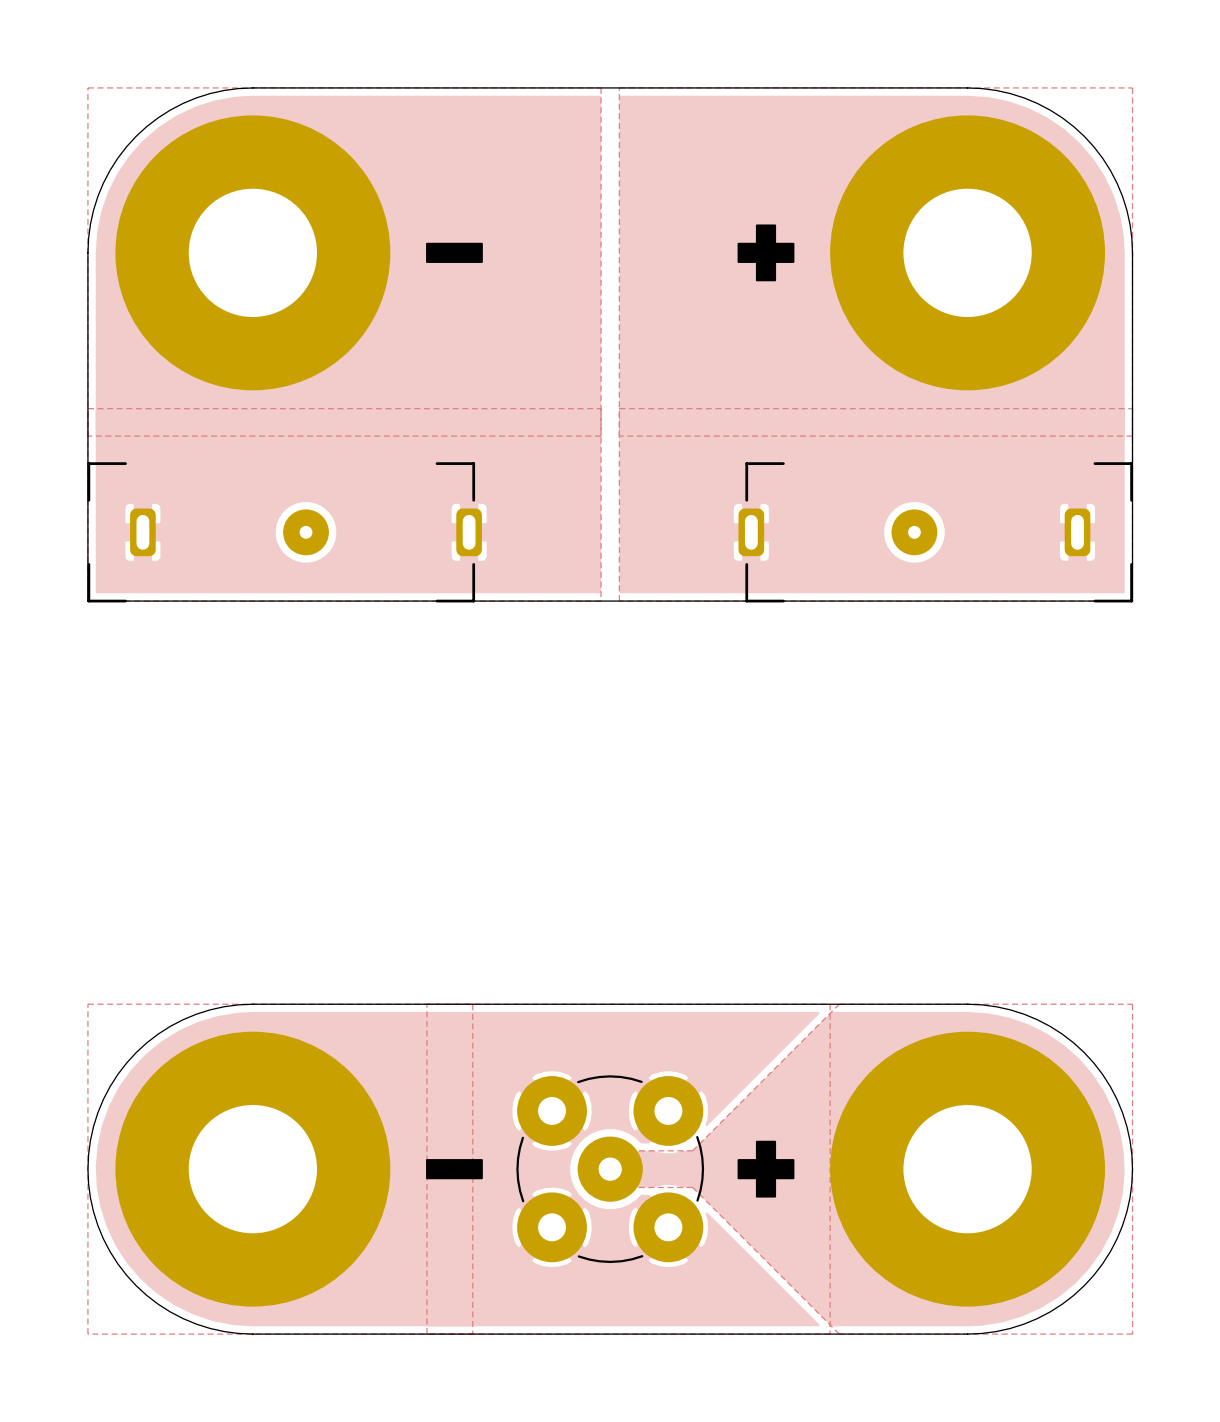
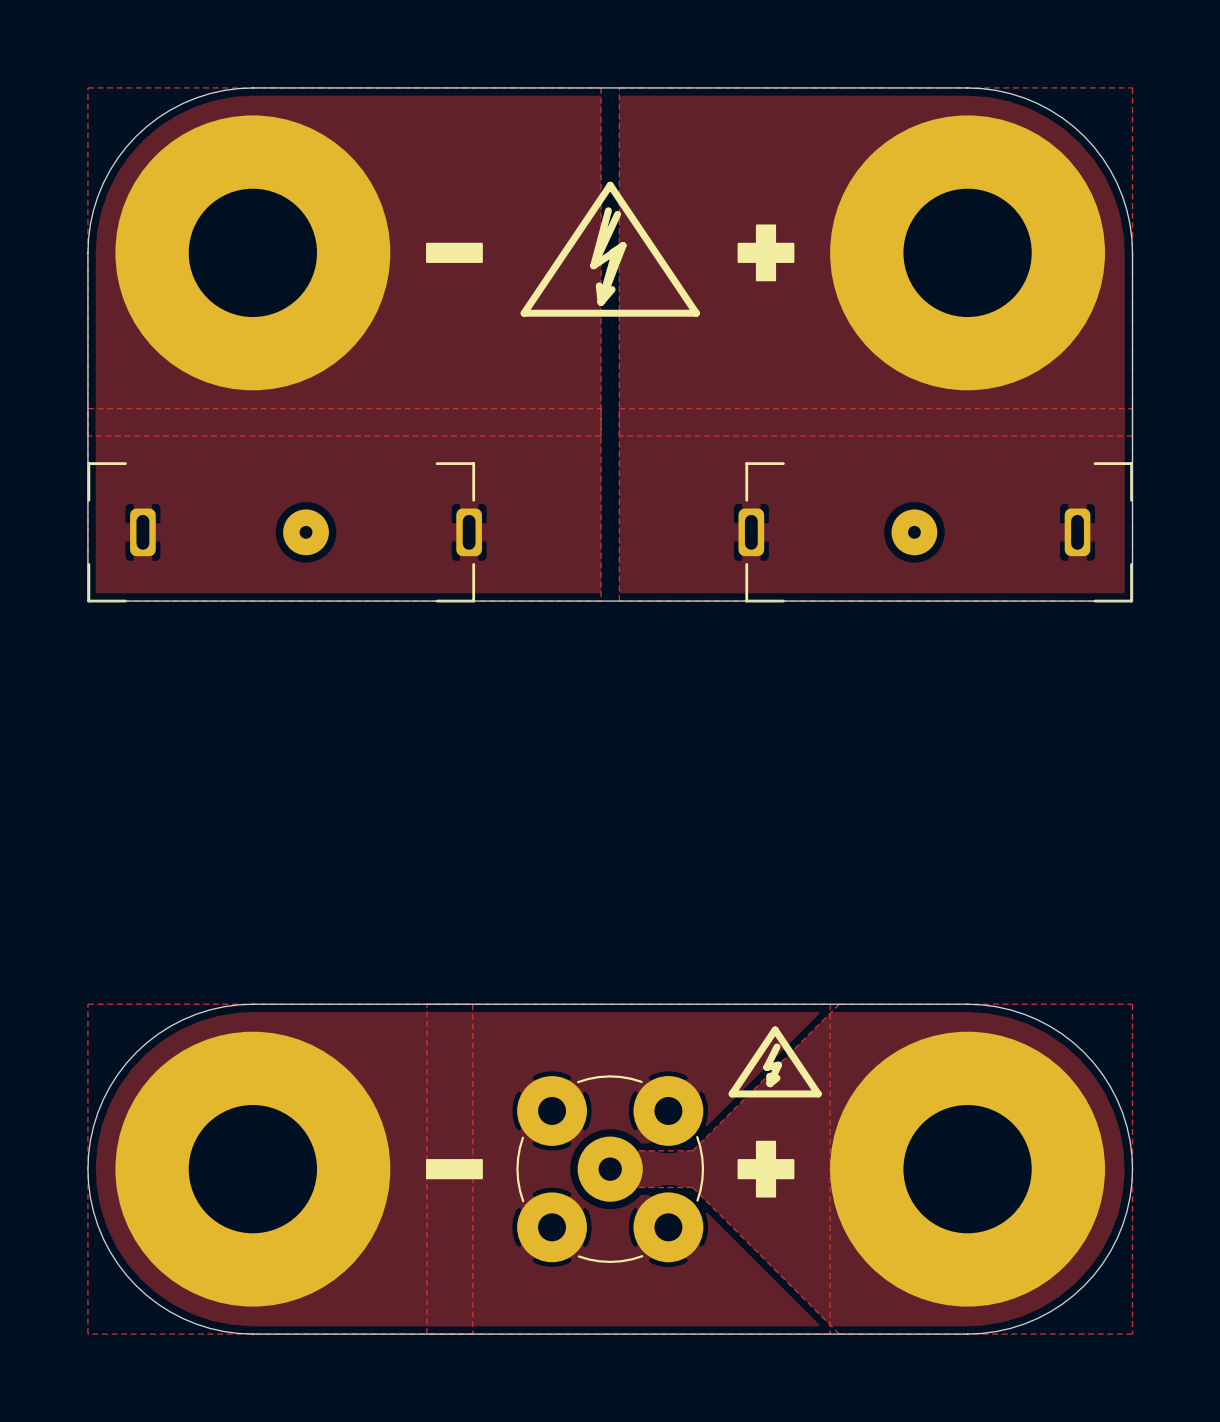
drawing: none -> [520, 181, 700, 317]
drawing: none -> [728, 1026, 822, 1098]

